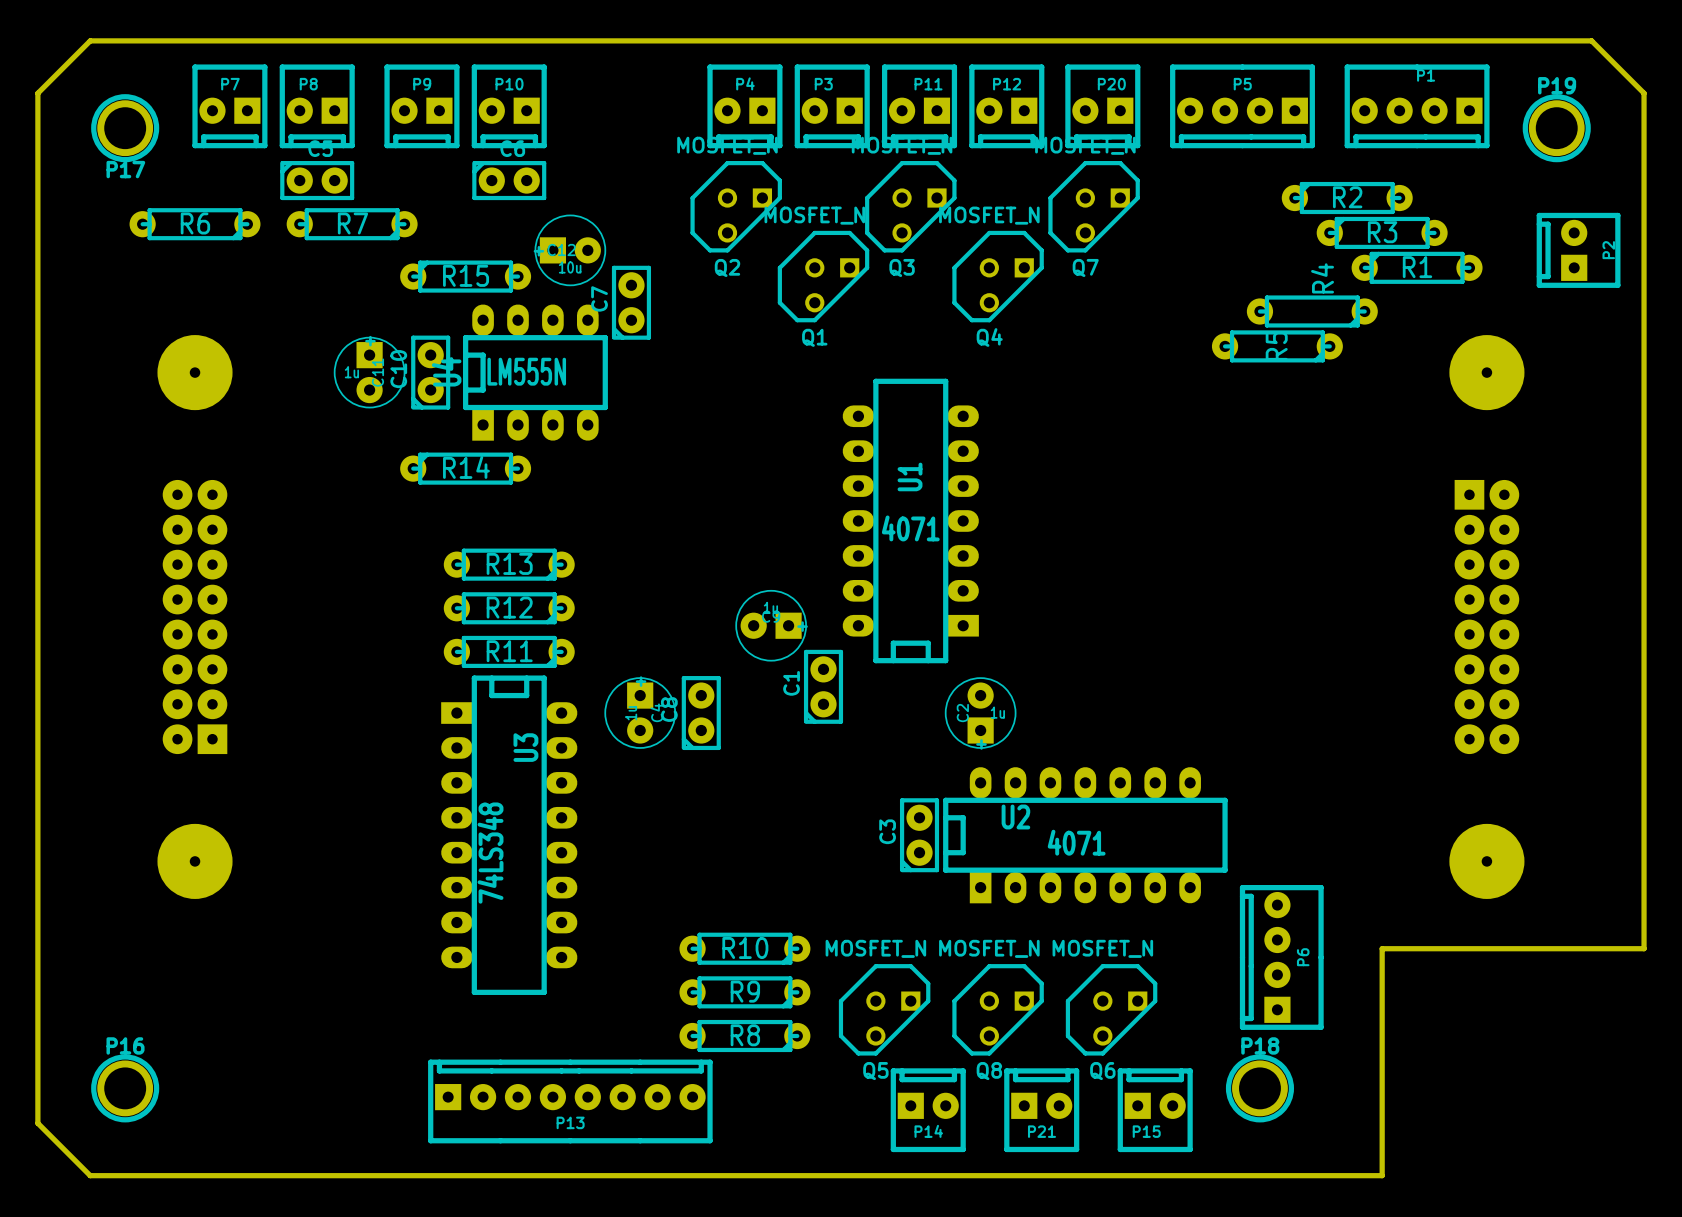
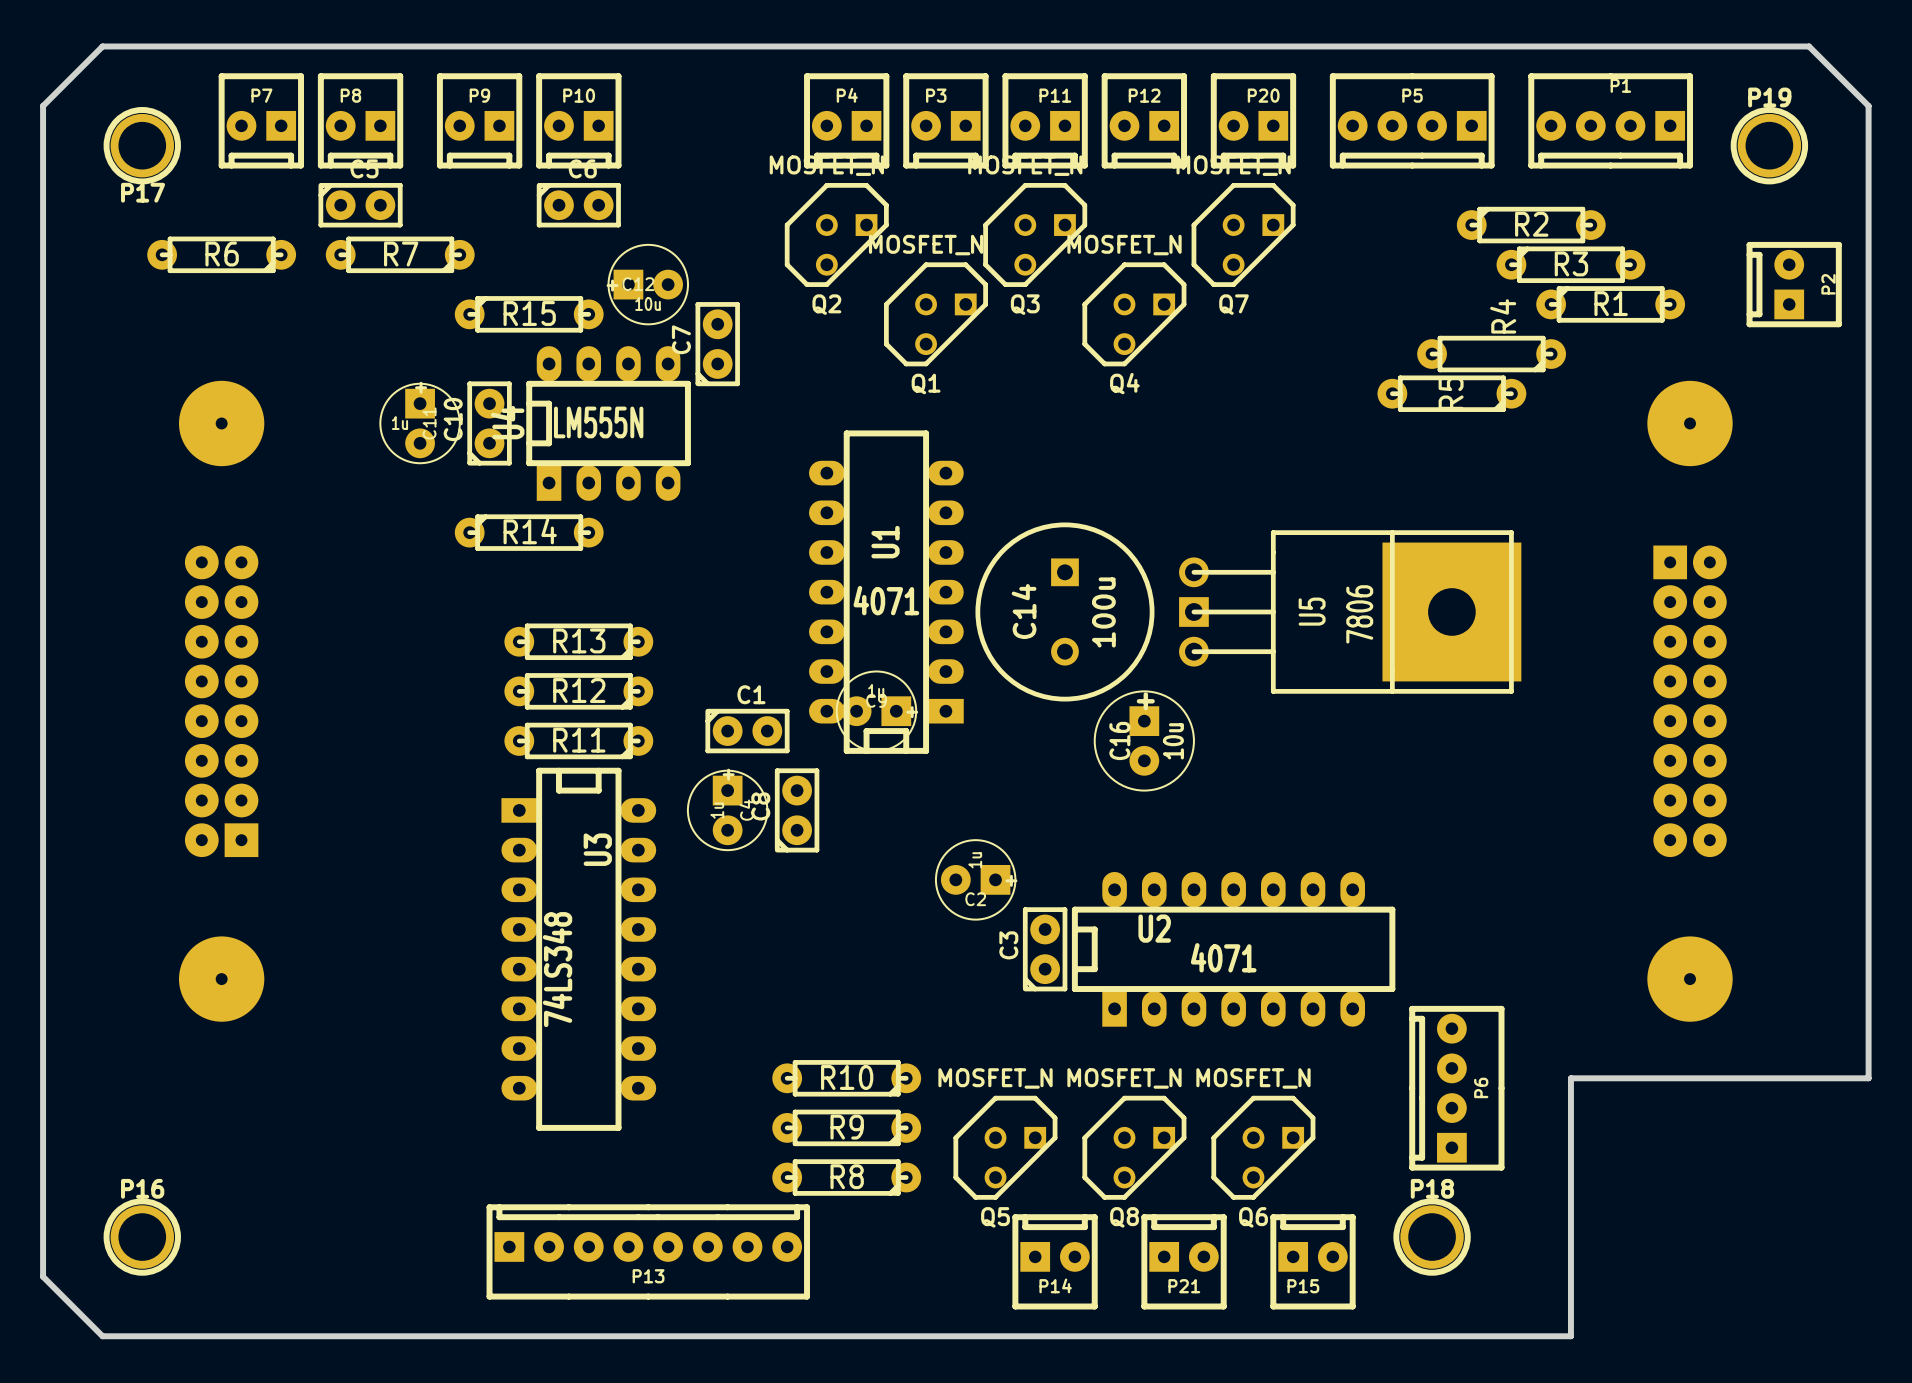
U1 position: (910, 520) -> (886, 592)
C14: none -> 100u (1064, 611)
U5: none -> 7806 (1350, 611)
C16: none -> 10u (1144, 740)
C1 rotation: 0° (823, 686) -> 90° clockwise (747, 731)
C1 position: (823, 686) -> (747, 731)
C2 rotation: 0° (980, 713) -> 90° counterclockwise (975, 879)
C2 position: (980, 713) -> (975, 879)

